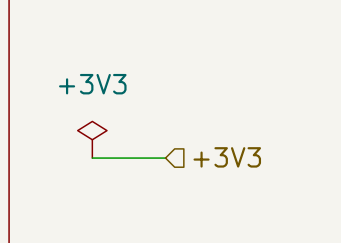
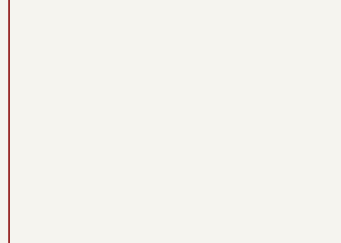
power symbol: +3V3 (92, 139) -> none
hierarchical label: +3V3 (227, 157) -> none
wire: (92, 158) (165, 158) -> none

